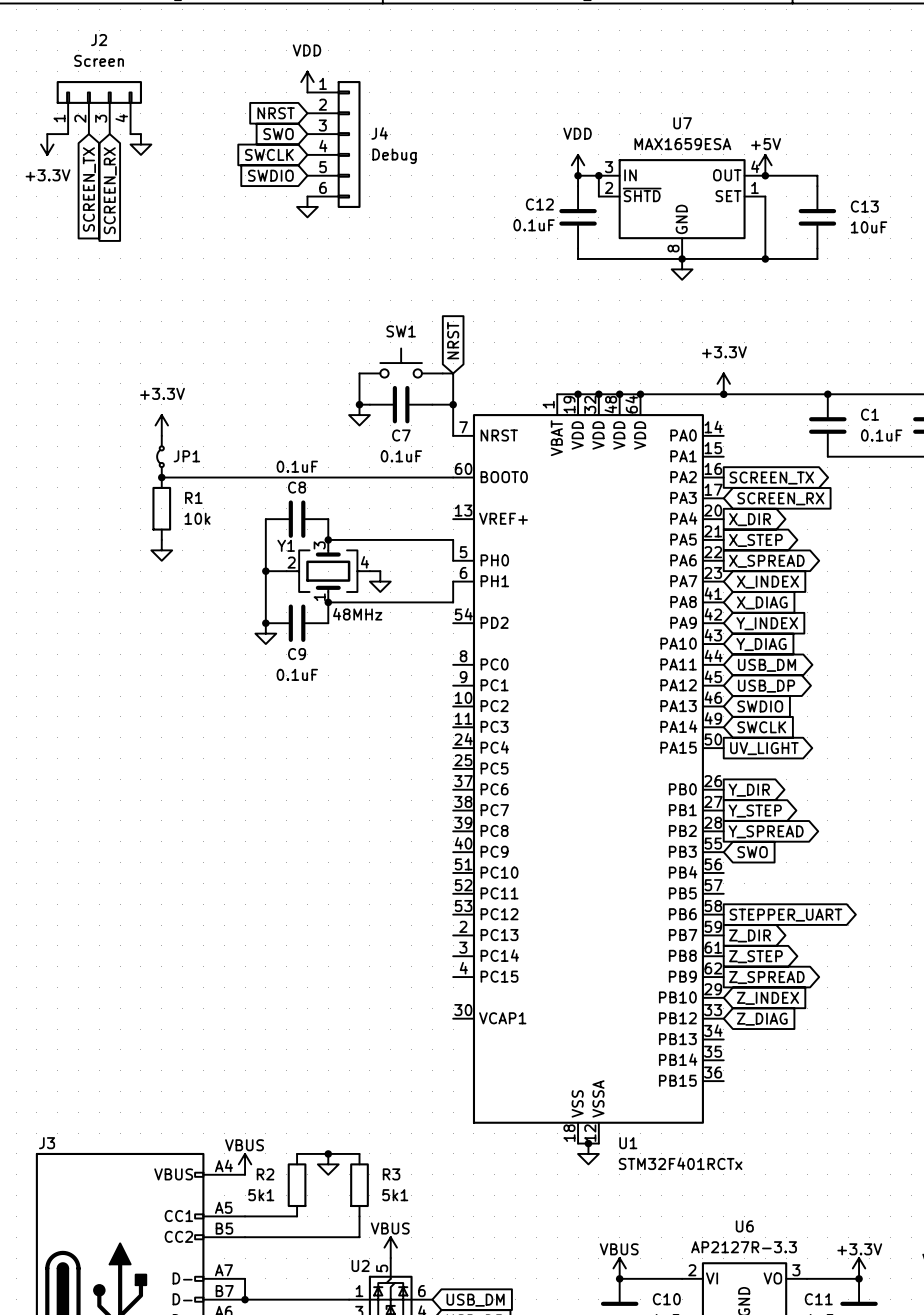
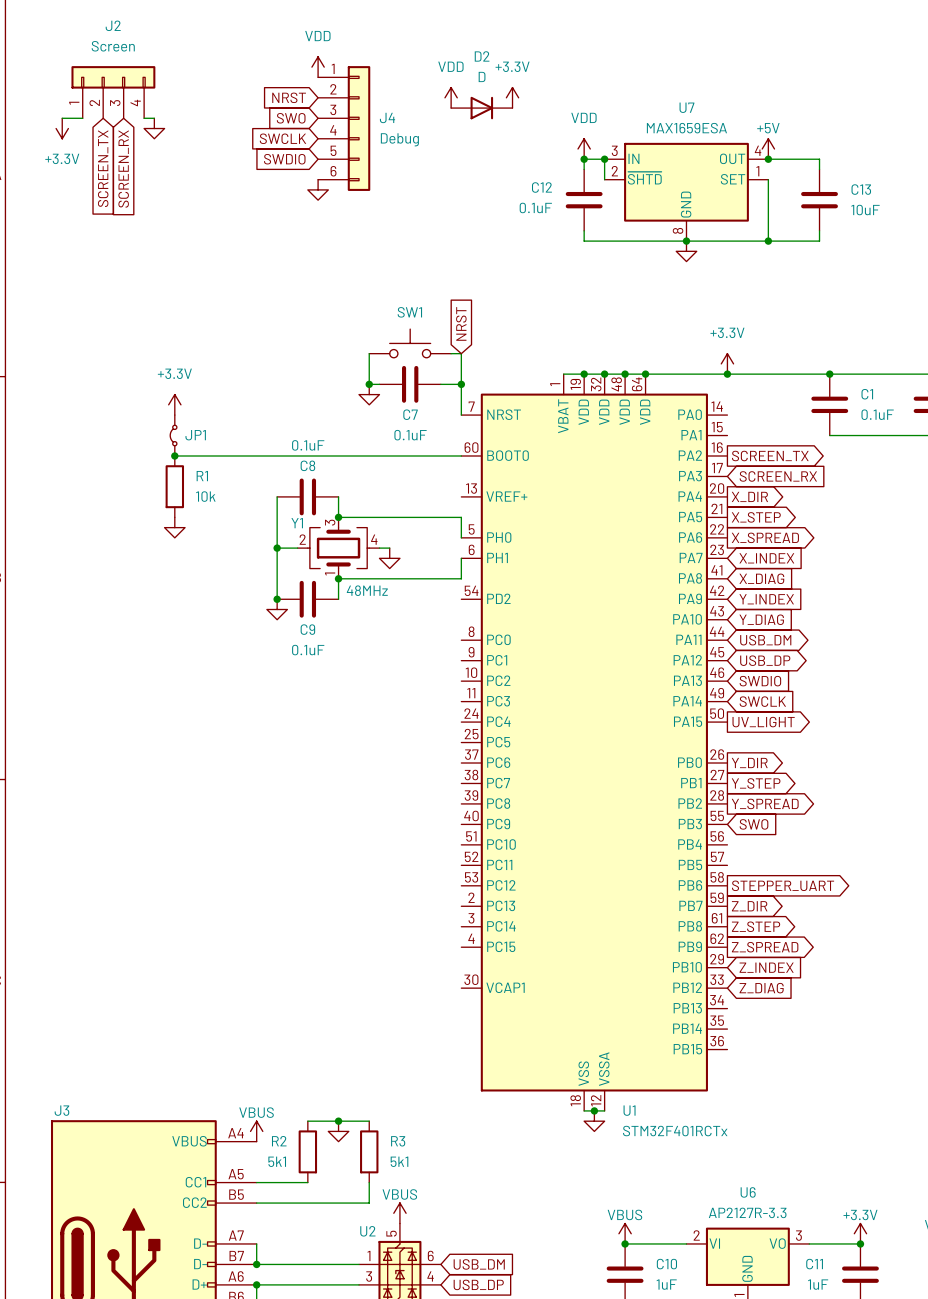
power symbol: none -> VDD (451, 97)
power symbol: none -> +3.3V (512, 97)
D2: none -> D (481, 108)

